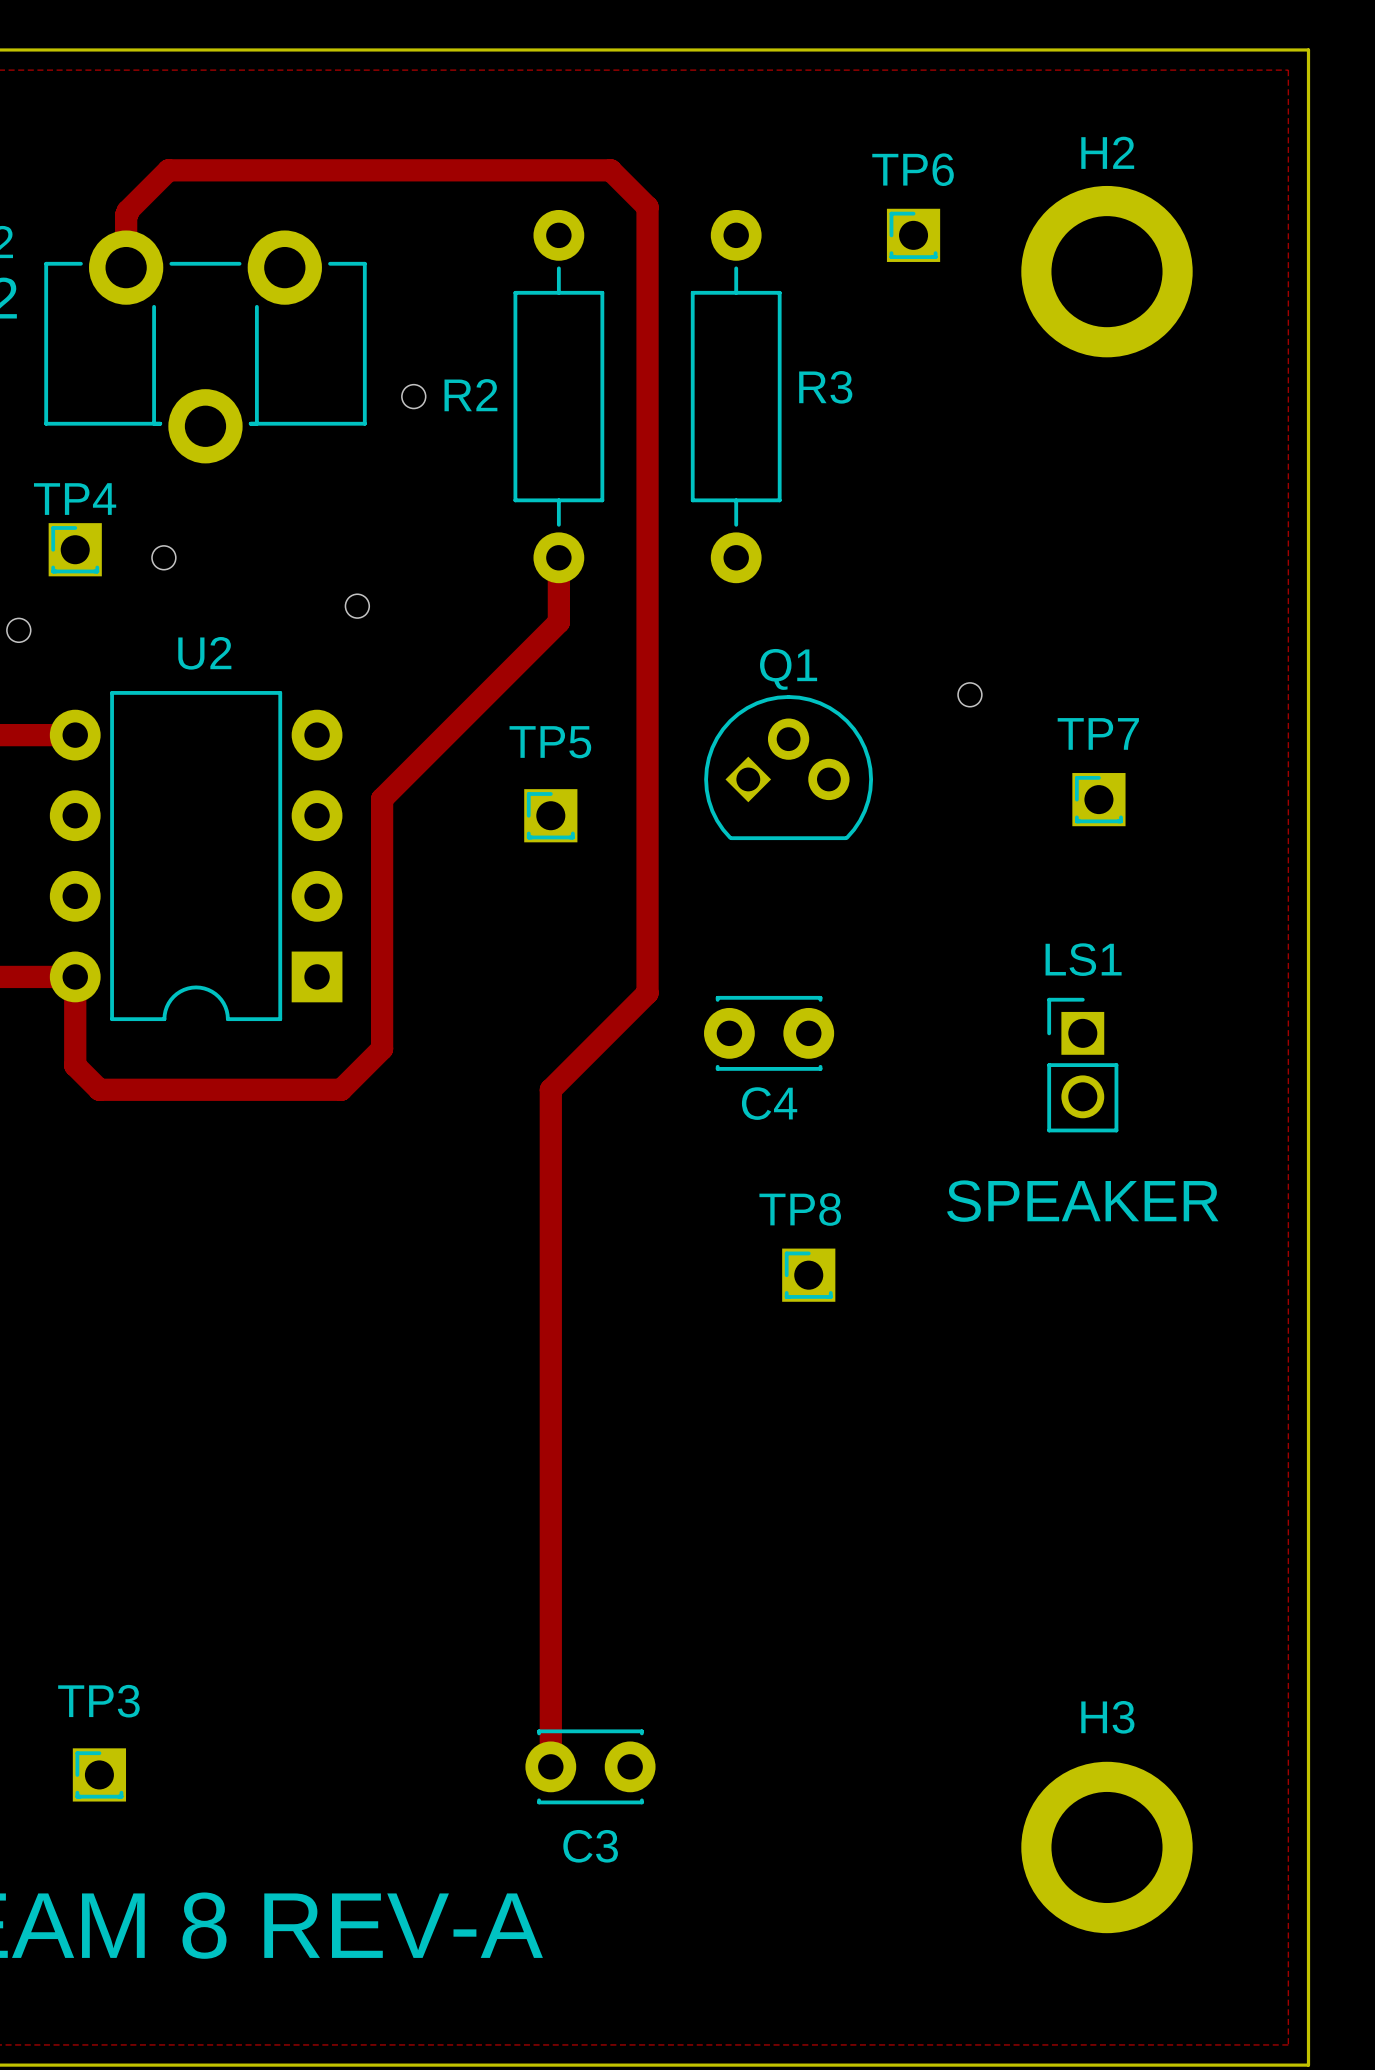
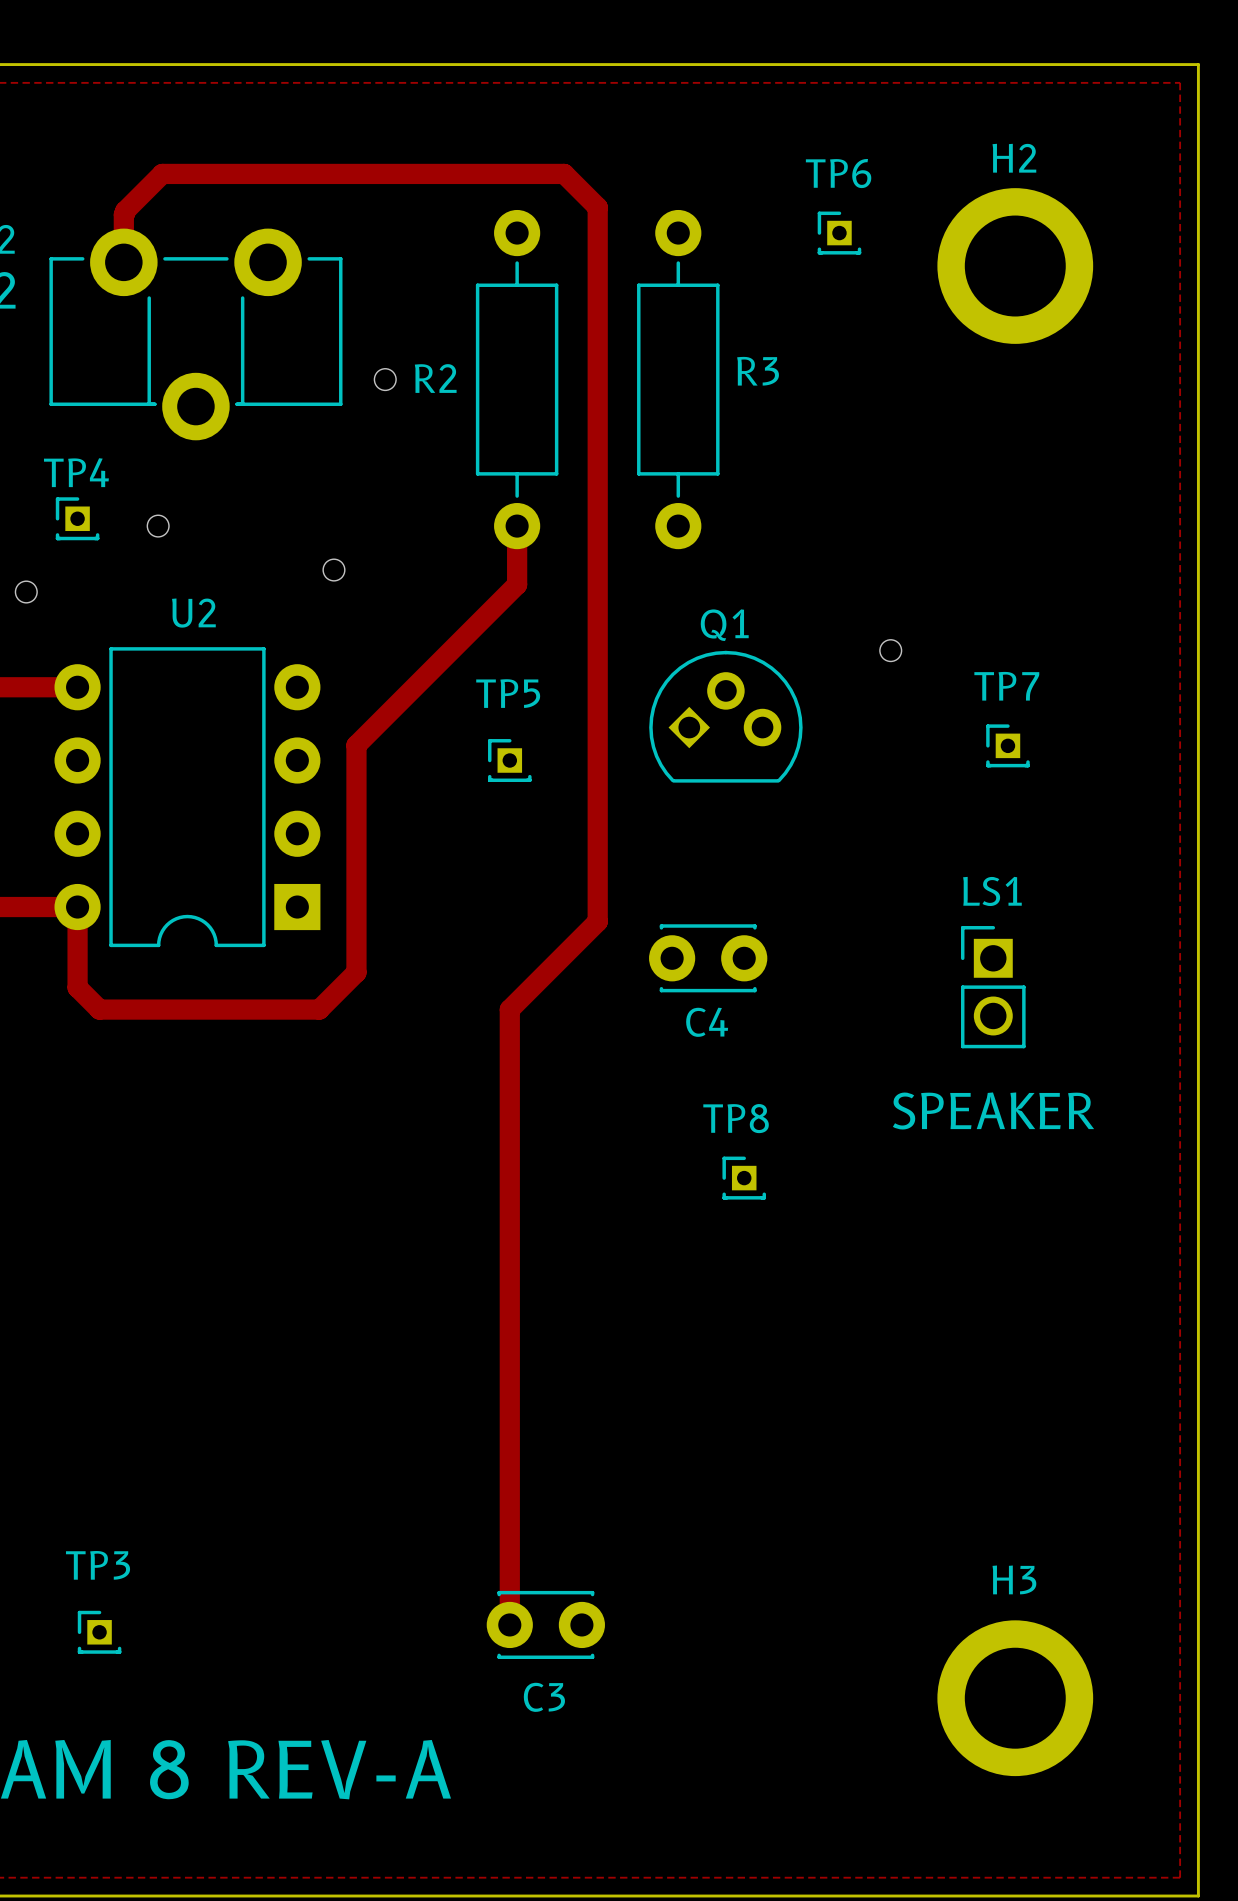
TP6 footprint: [886, 208, 941, 262] -> [817, 211, 862, 255]
TP4 footprint: [48, 523, 102, 577] -> [55, 497, 100, 541]
TP7 footprint: [1072, 773, 1126, 827] -> [986, 724, 1030, 768]
TP5 footprint: [524, 789, 578, 843] -> [488, 739, 532, 783]
TP8 footprint: [782, 1248, 836, 1302] -> [722, 1156, 767, 1200]
TP3 footprint: [72, 1748, 127, 1802] -> [77, 1610, 122, 1654]

